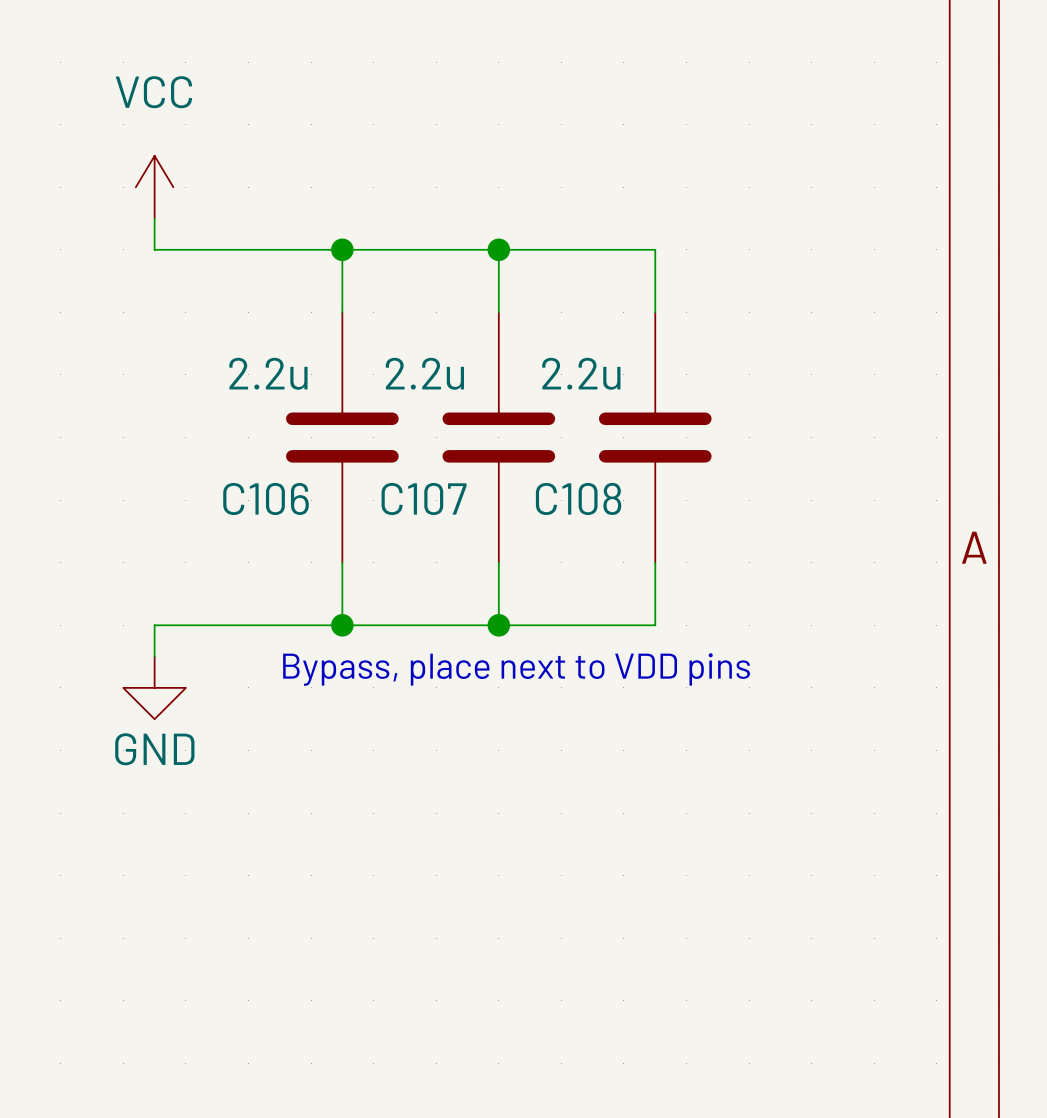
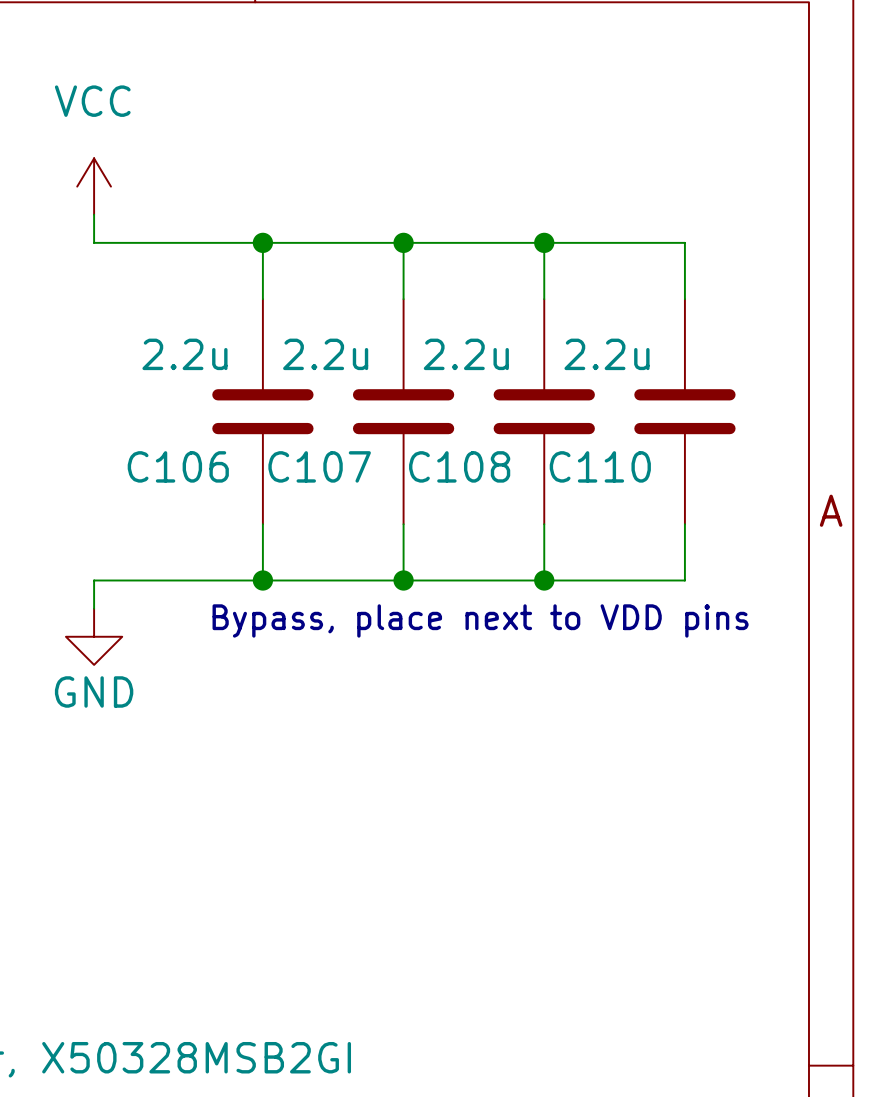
wire: none -> (544, 242) (684, 242) (684, 299)
junction: none -> (544, 242)
C110: none -> 2.2u (684, 411)
wire: none -> (684, 524) (684, 580) (544, 580)
junction: none -> (544, 580)

